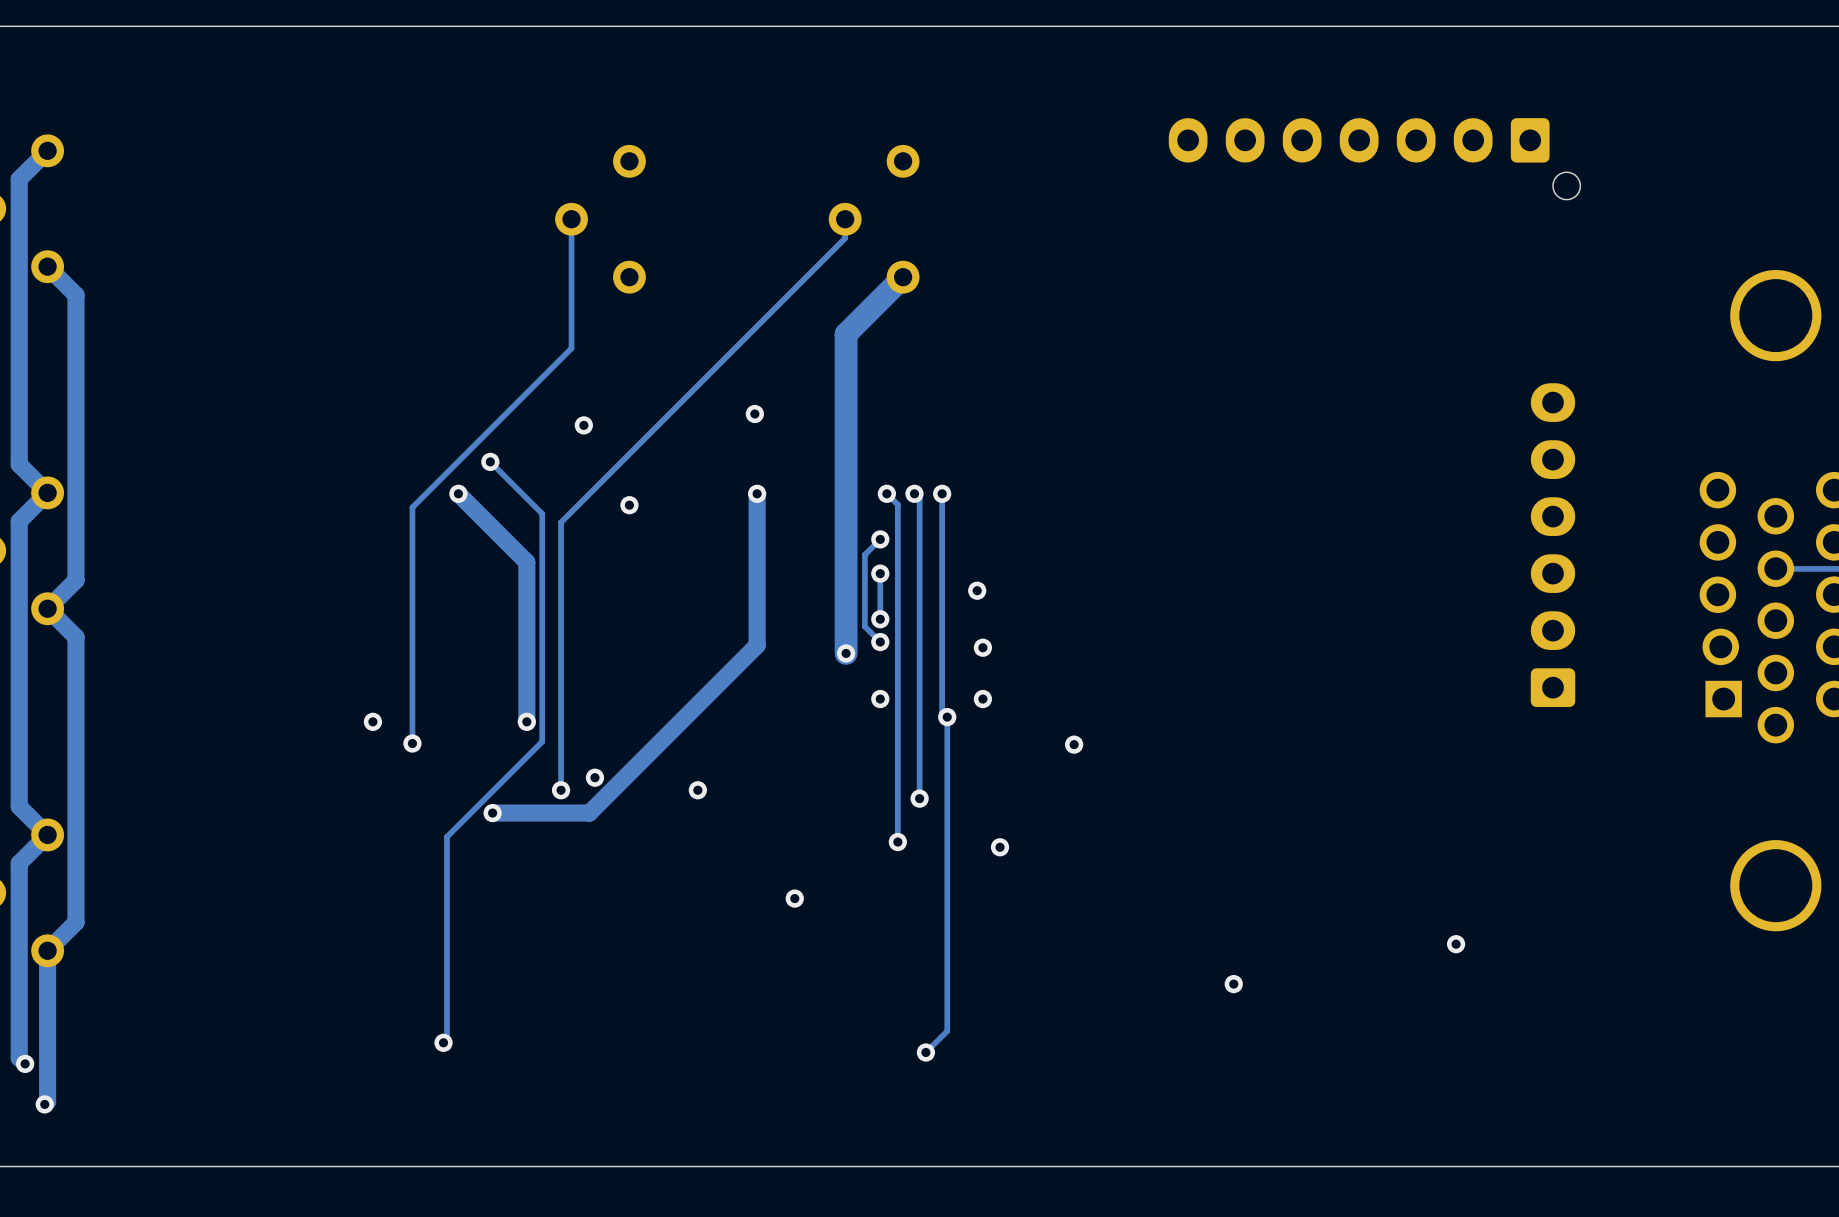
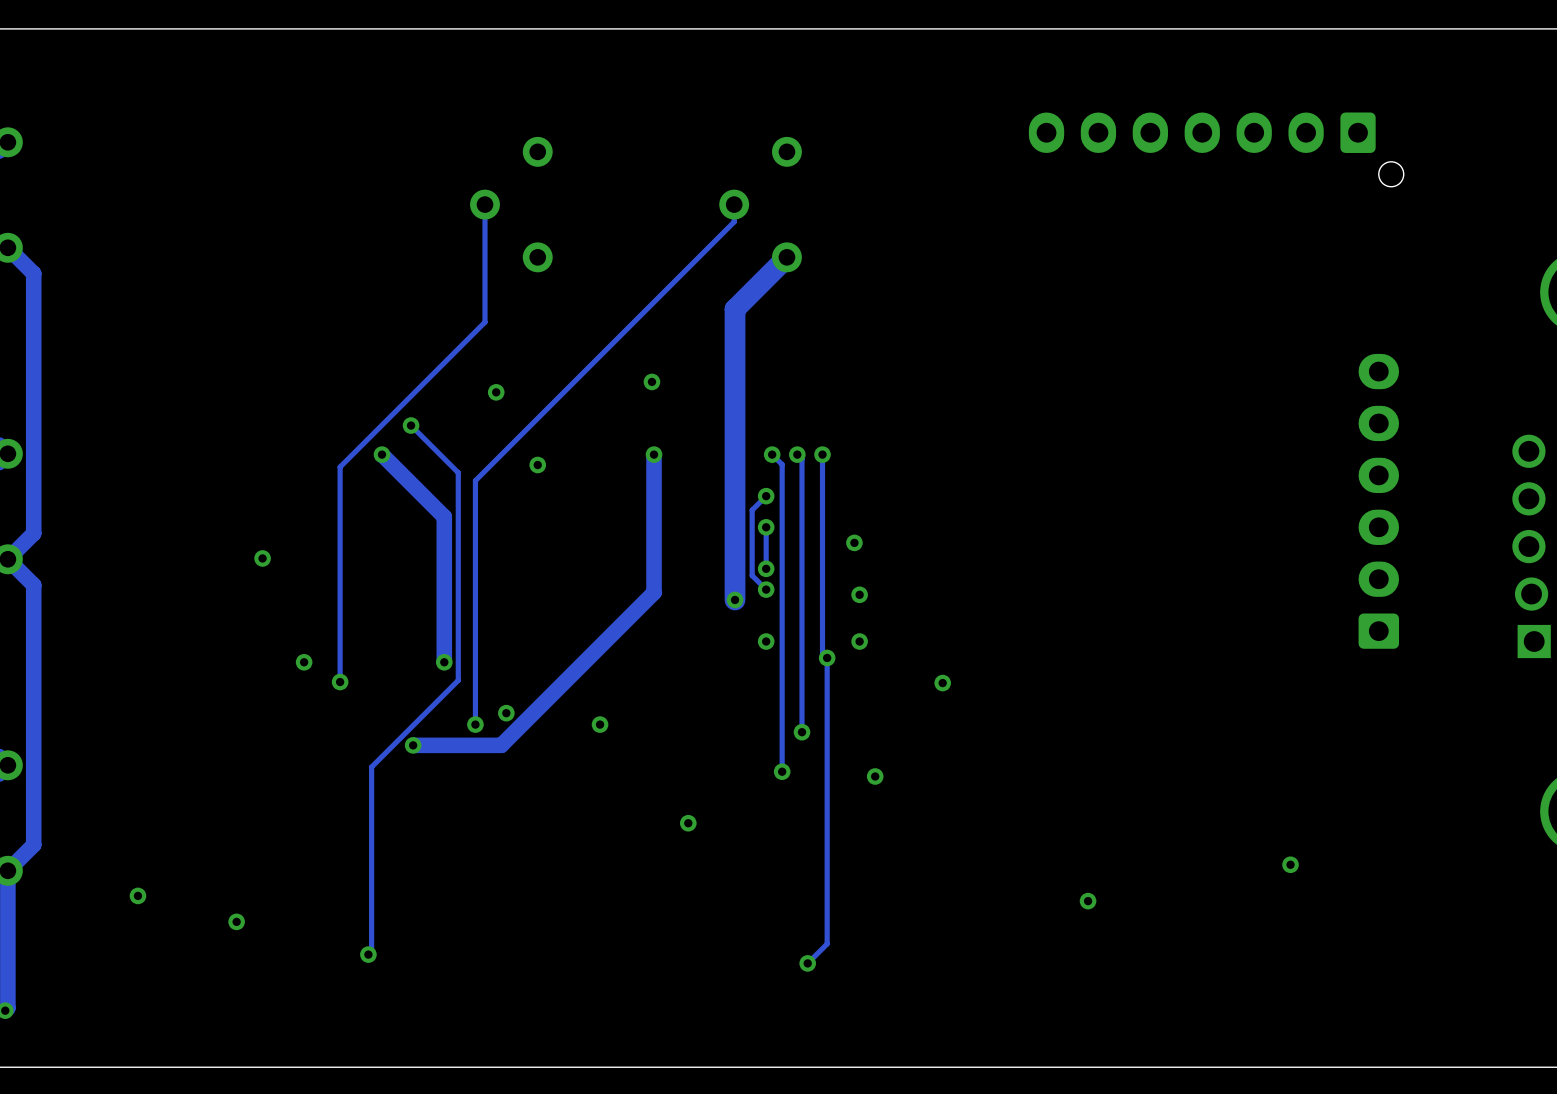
via: none -> (262, 558)
via: none -> (137, 895)
via: none -> (236, 921)

